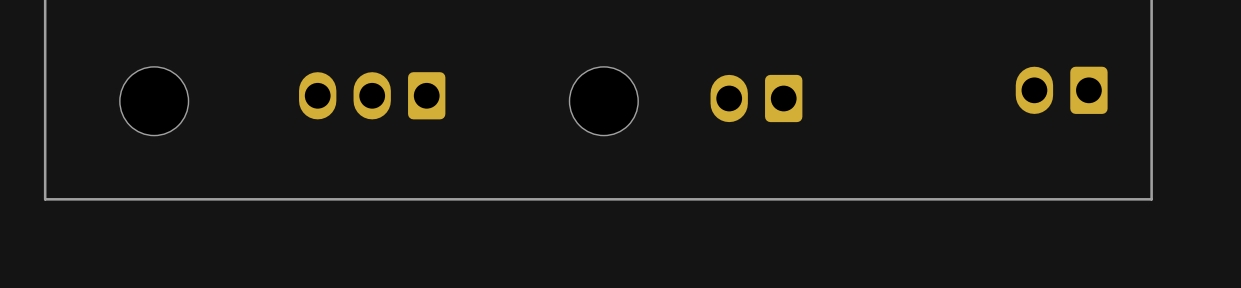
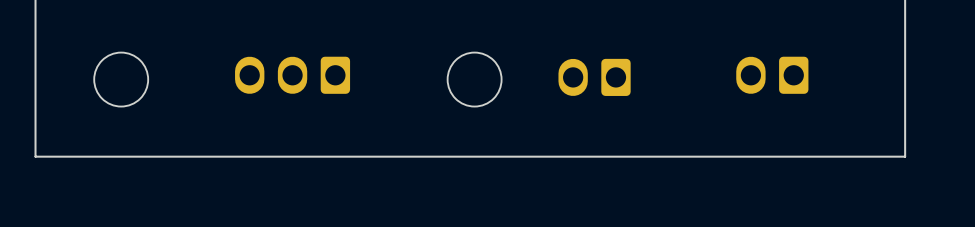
part position: (1061, 90) -> (772, 75)

